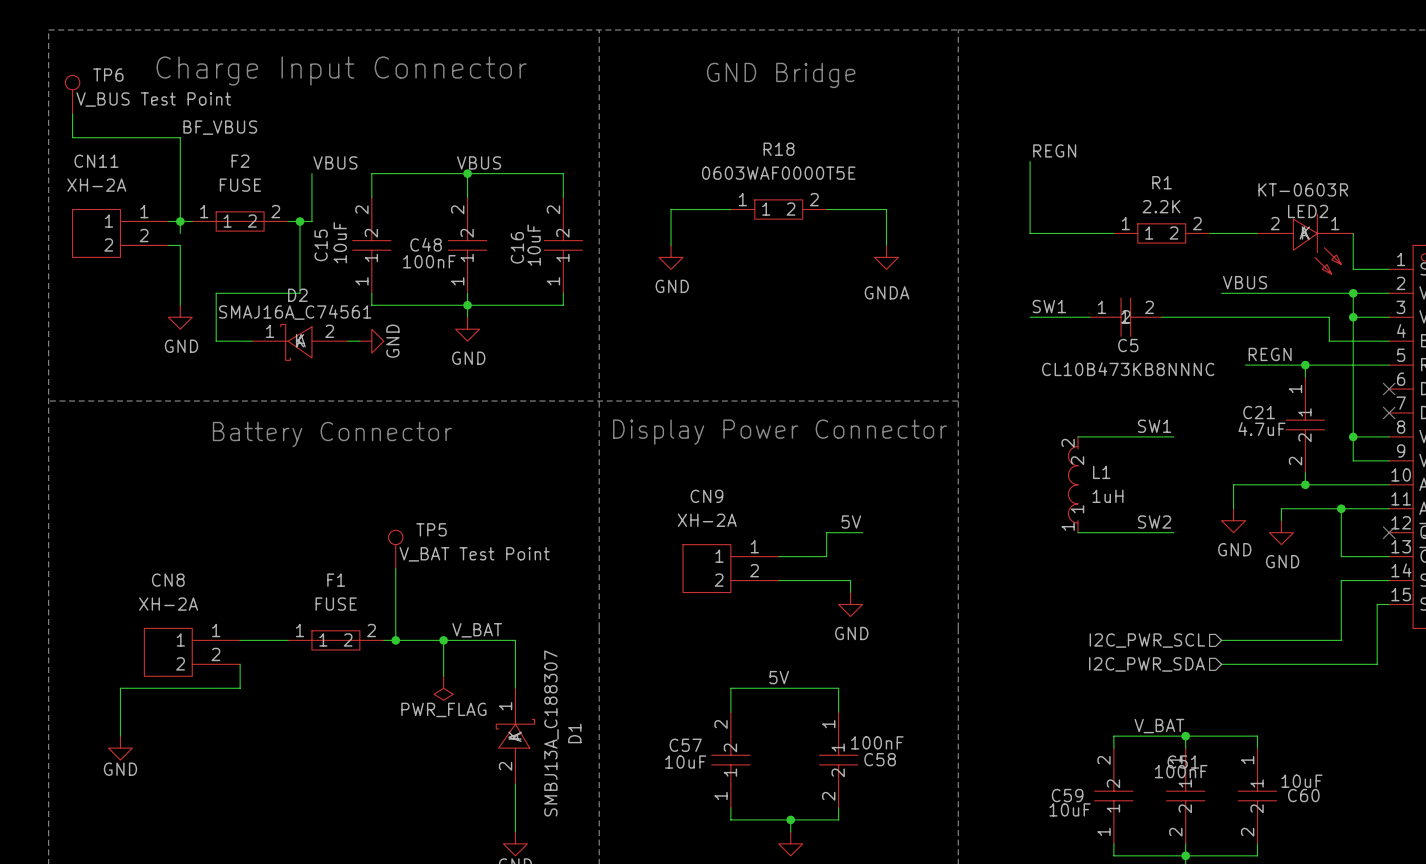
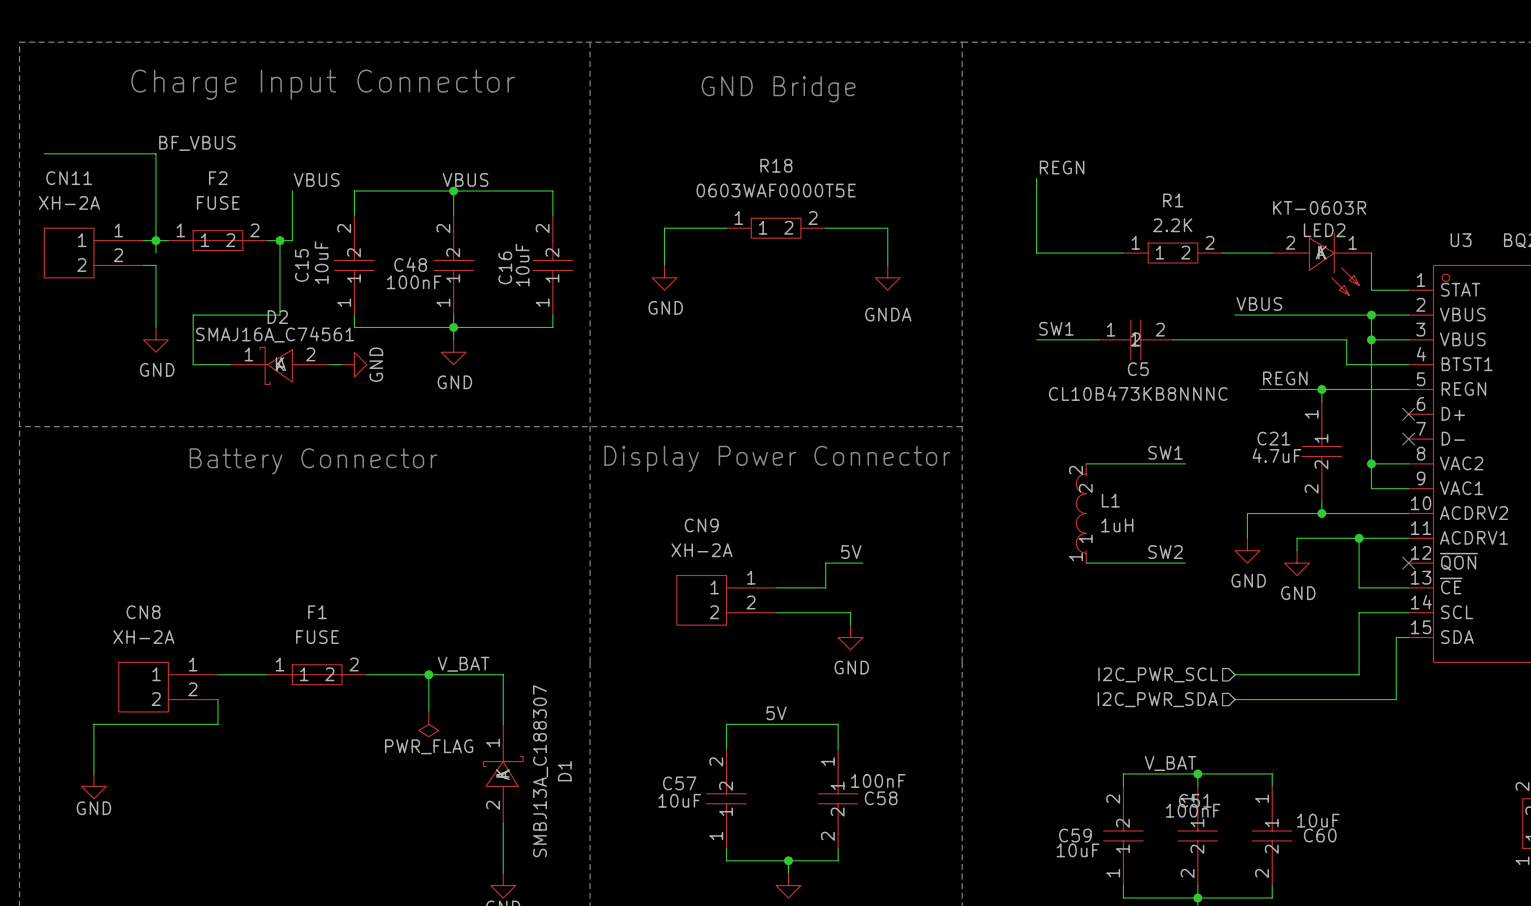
TP6: V_BUS Test Point (72, 94) -> none
wire: (72, 113) (72, 137) -> none
TP5: V_BAT Test Point (395, 549) -> none
wire: (395, 568) (395, 640) -> none
junction: (395, 640) -> none

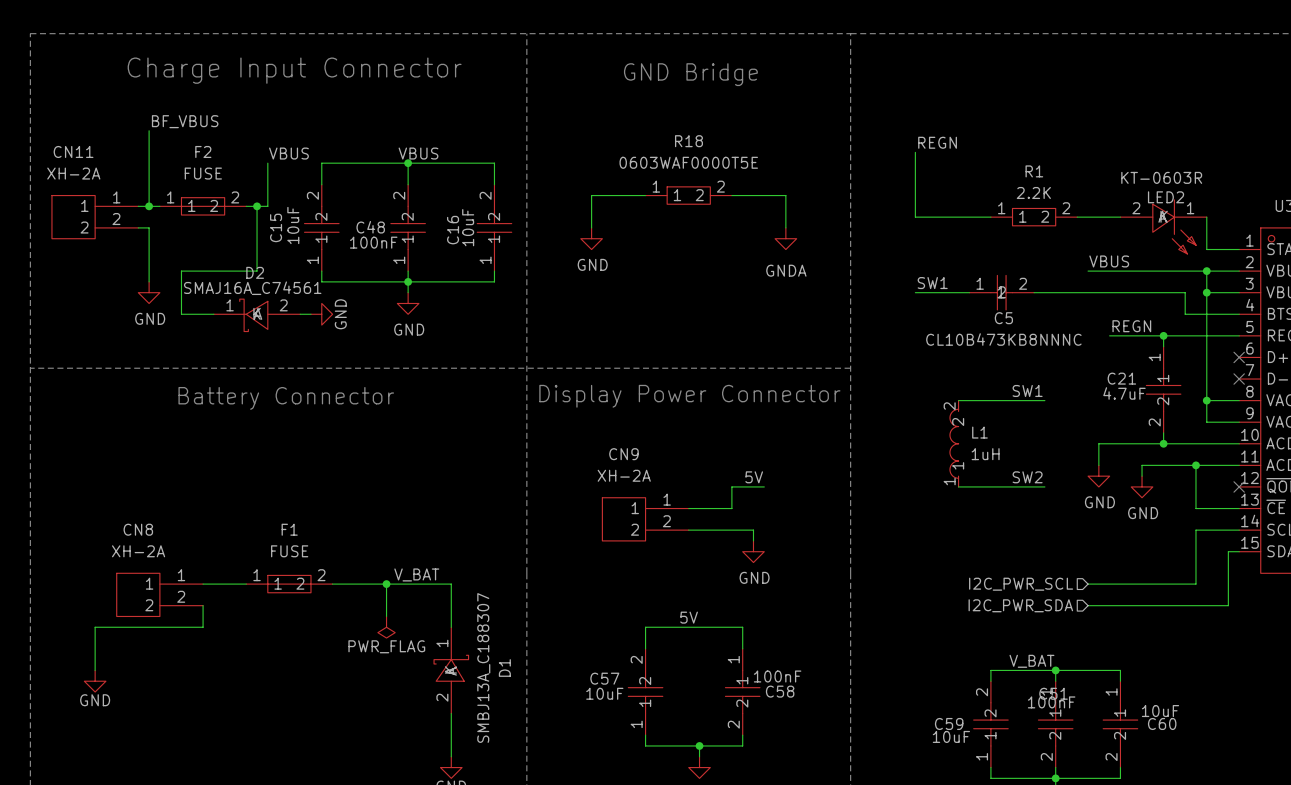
wire: (44, 153) (155, 153) -> none
wire: (155, 240) (155, 253) -> none

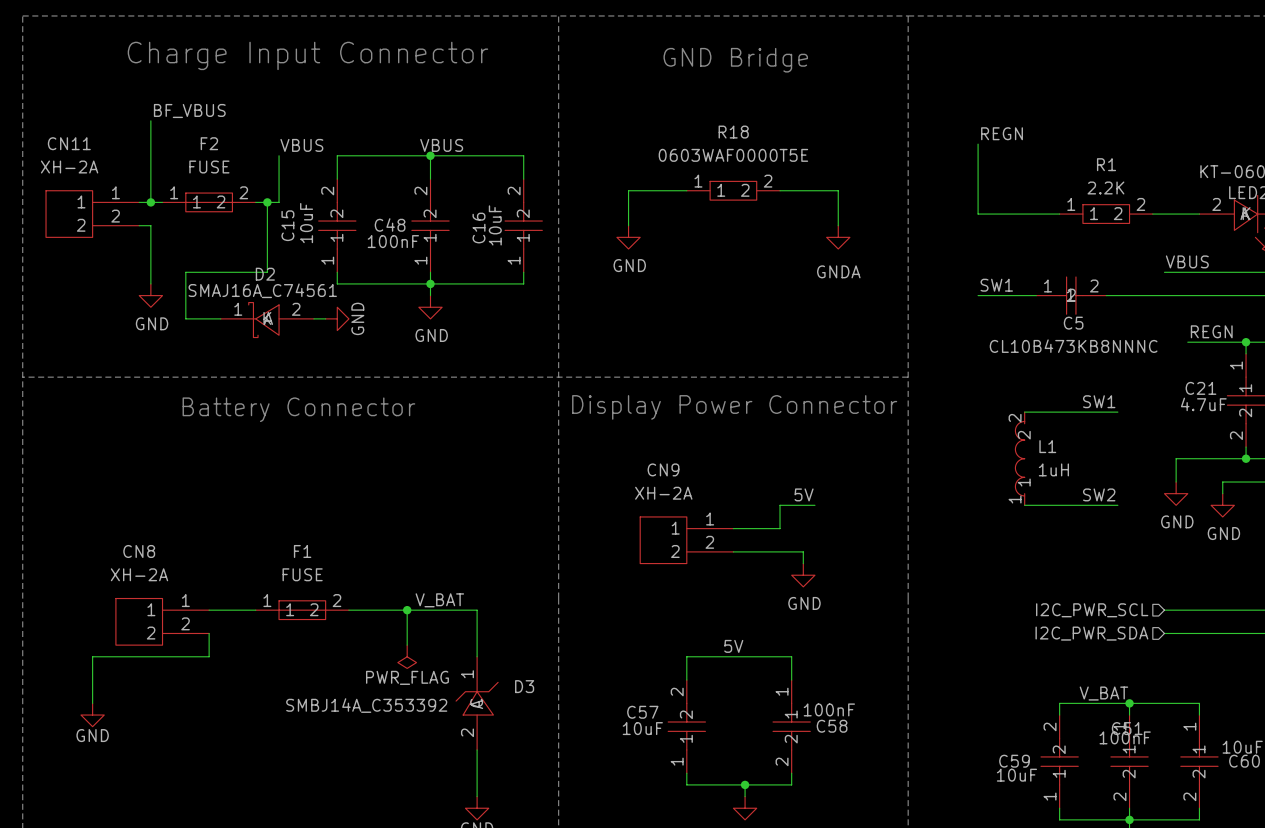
D1: SMBJ13A_C188307 (451, 670) -> none
D3: none -> SMBJ14A_C353392 (477, 703)

